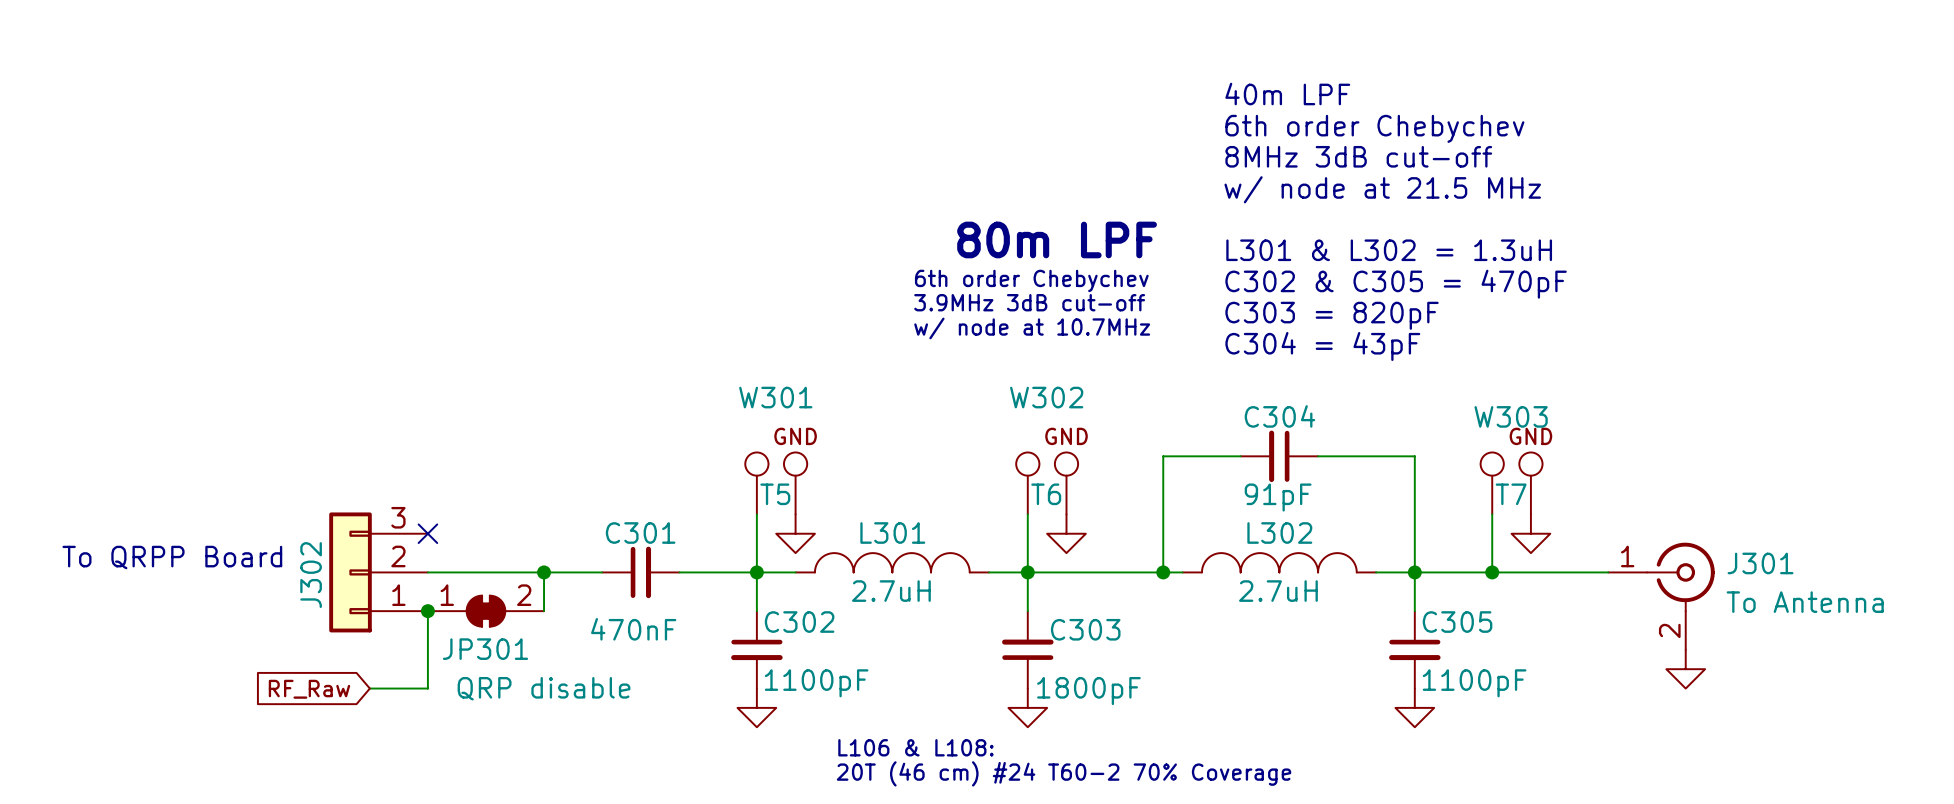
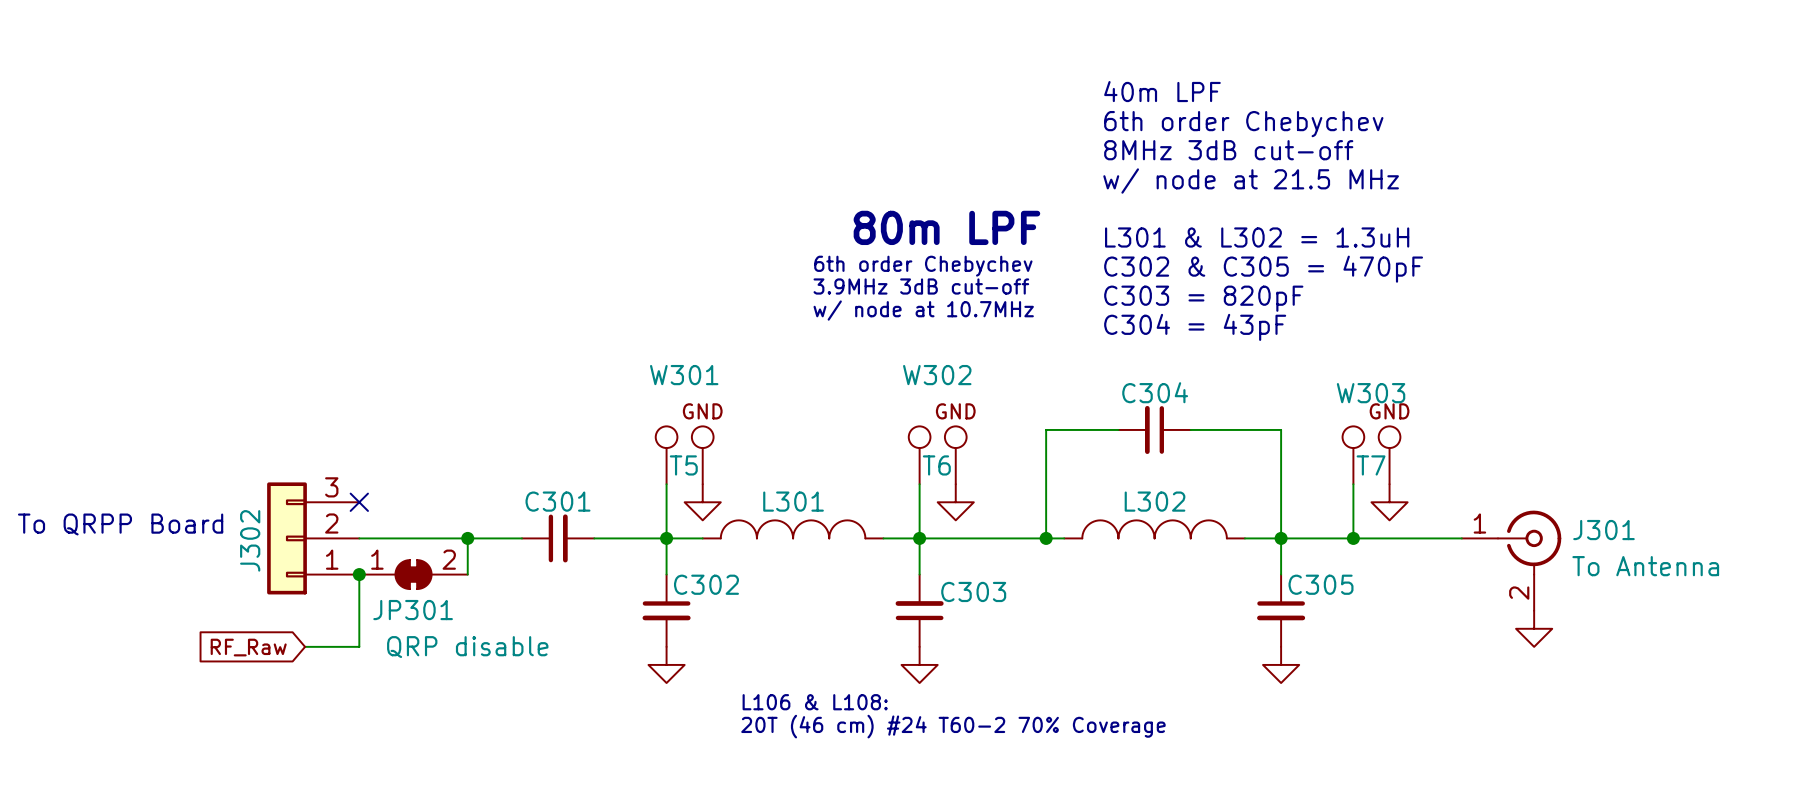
C304 value: 91pF (1278, 497) -> none
L301 value: 2.7uH (891, 591) -> none
L302 value: 2.7uH (1278, 591) -> none
C301 value: 470nF (633, 629) -> none
C302 value: 1100pF (816, 683) -> none
C305 value: 1100pF (1474, 683) -> none
C303 value: 1800pF (1088, 691) -> none

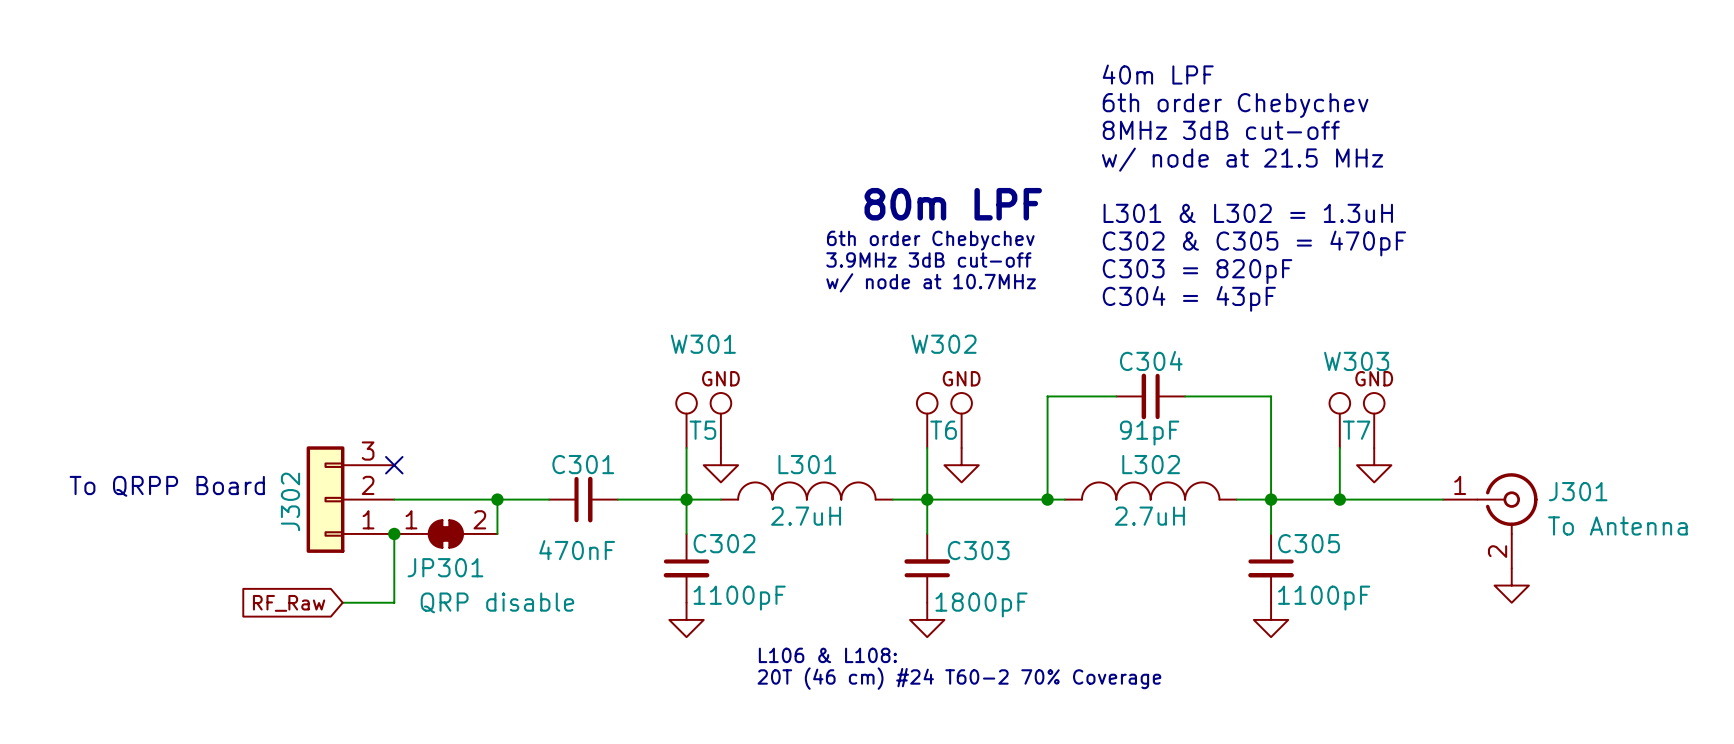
C304 value: none -> 91pF (1149, 433)
L301 value: none -> 2.7uH (806, 516)
L302 value: none -> 2.7uH (1149, 516)
C301 value: none -> 470nF (577, 550)
C302 value: none -> 1100pF (739, 598)
C305 value: none -> 1100pF (1324, 598)
C303 value: none -> 1800pF (981, 604)

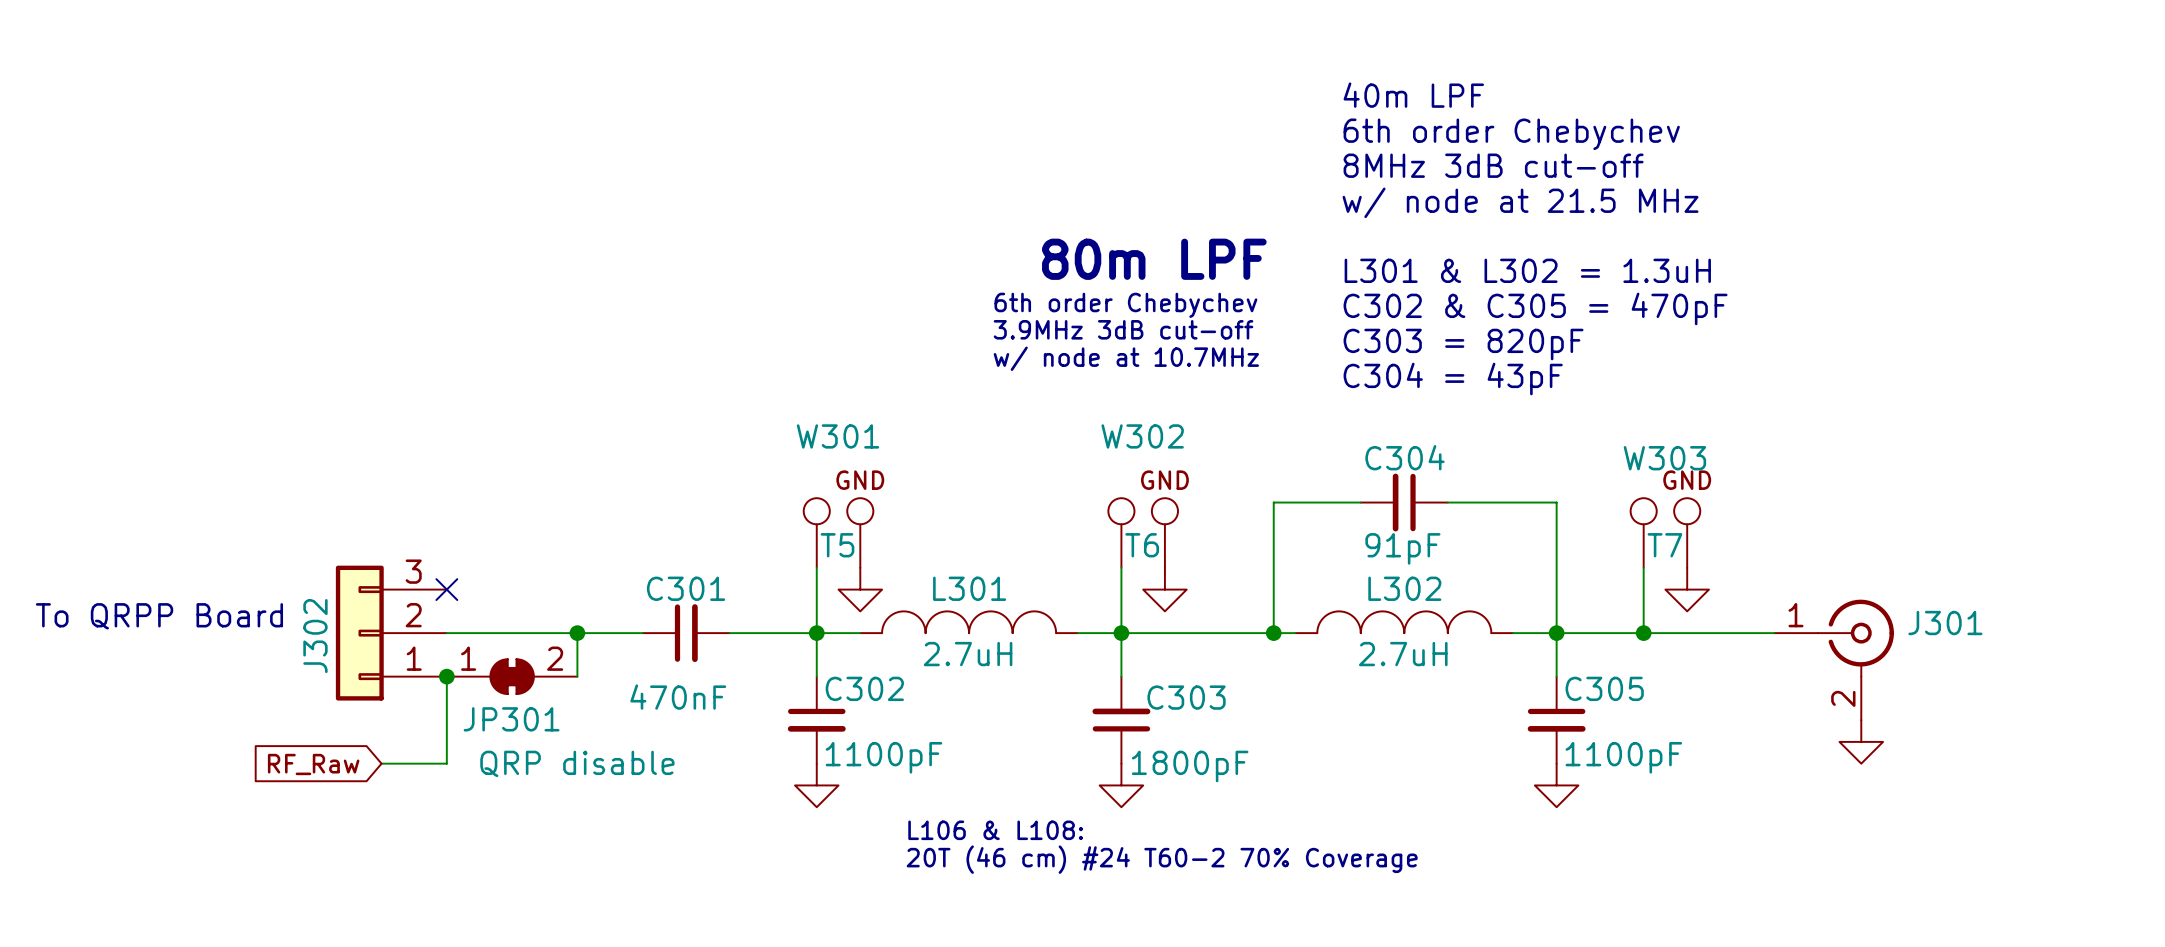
J301 value: To Antenna (1617, 525) -> none

